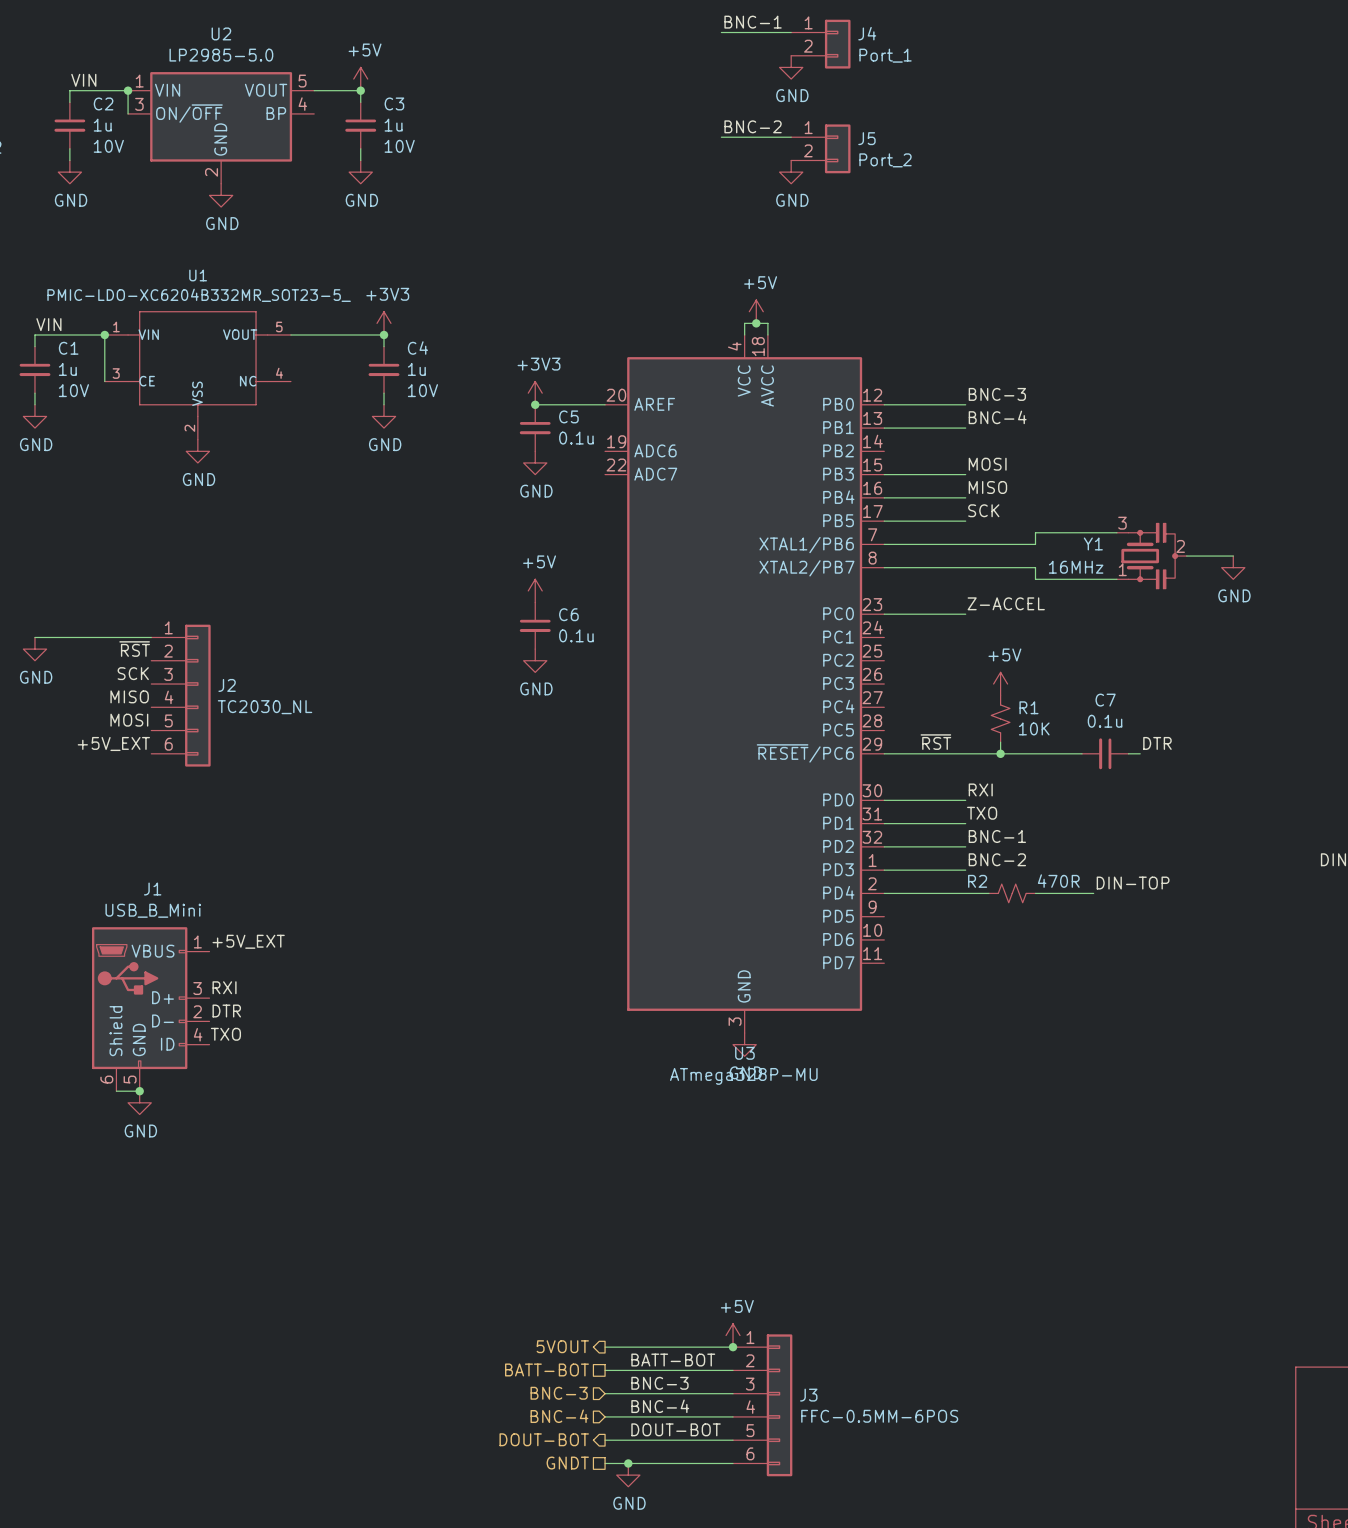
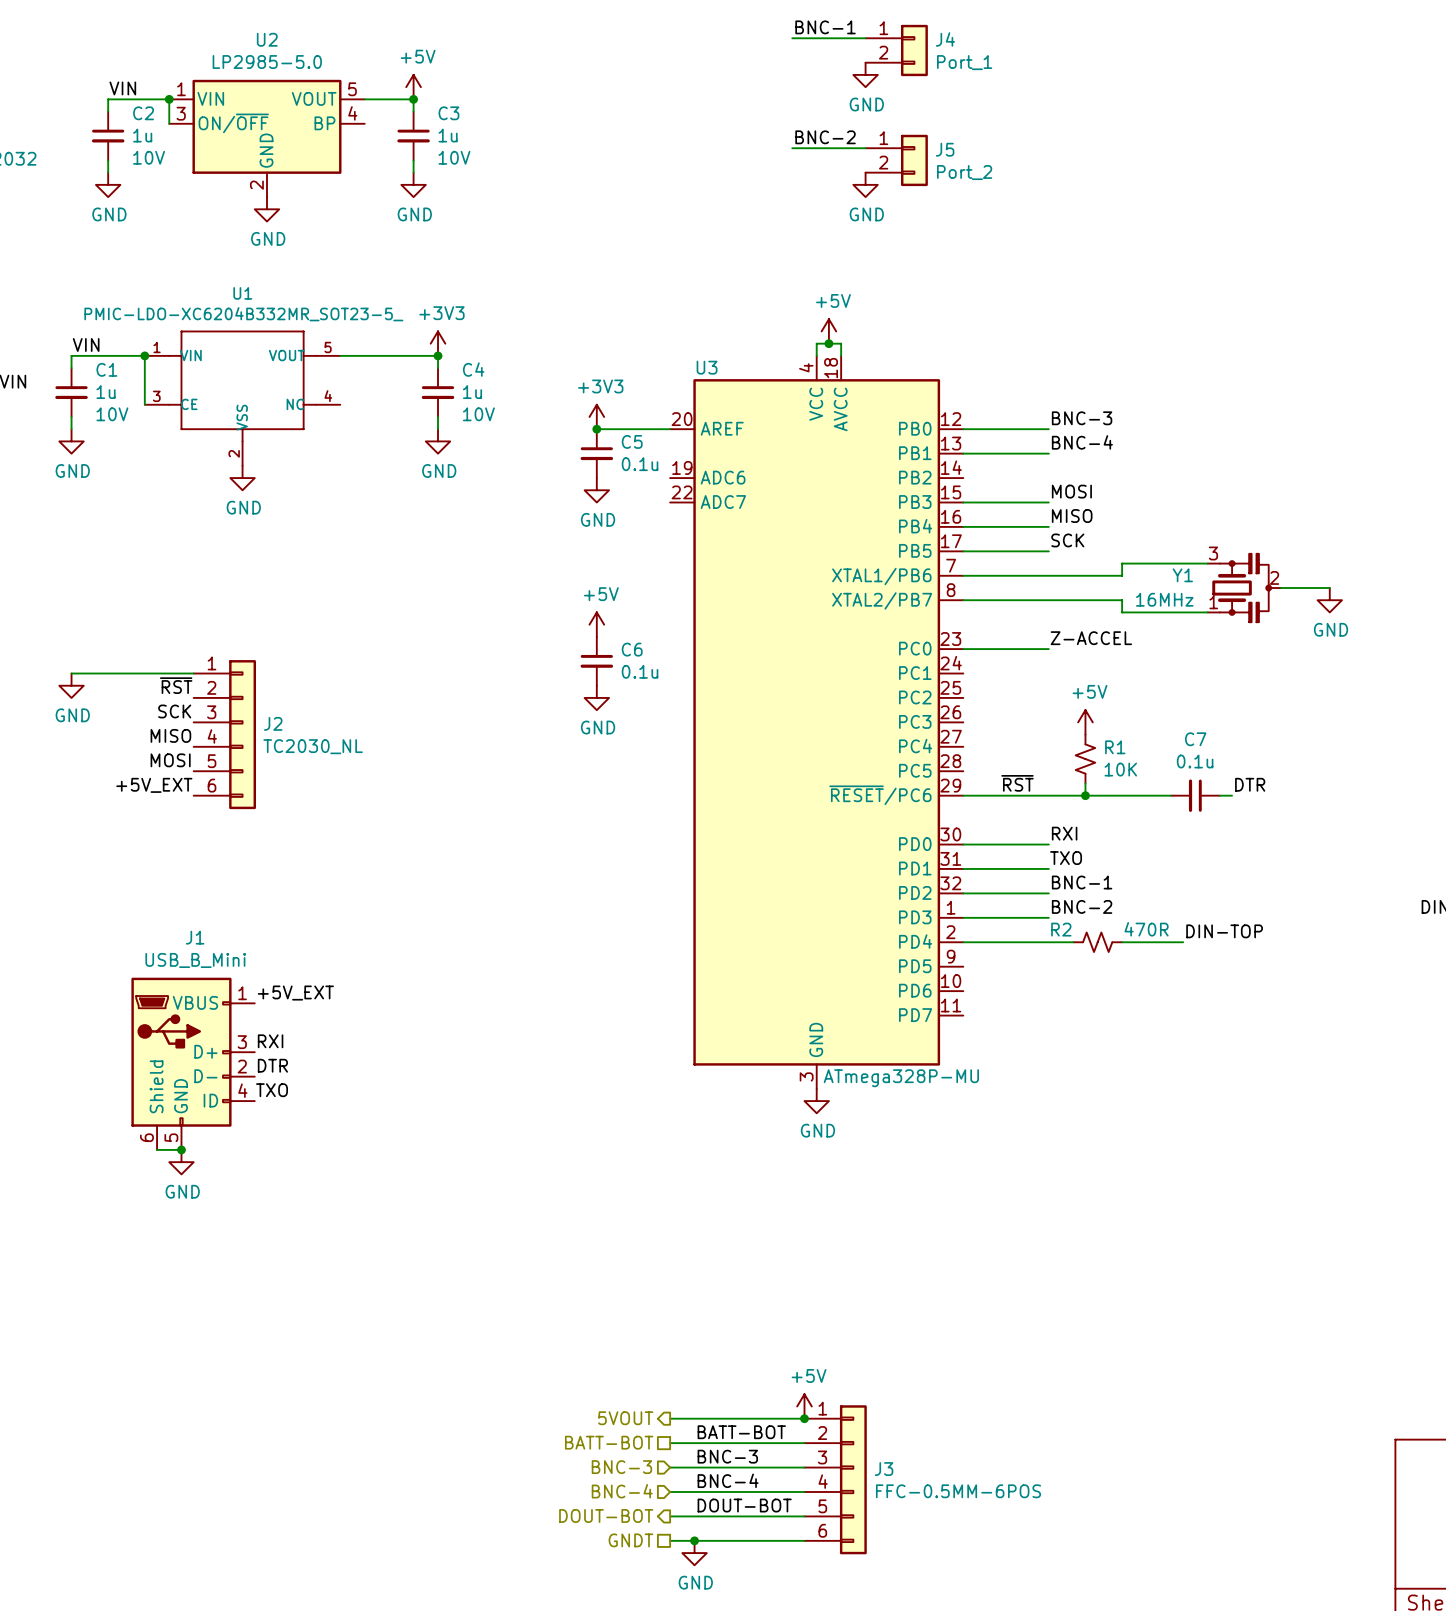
U3 name position: U3 (744, 1053) -> U3 (707, 367)
U3 value position: ATmega328P-MU (743, 1076) -> ATmega328P-MU (901, 1078)

